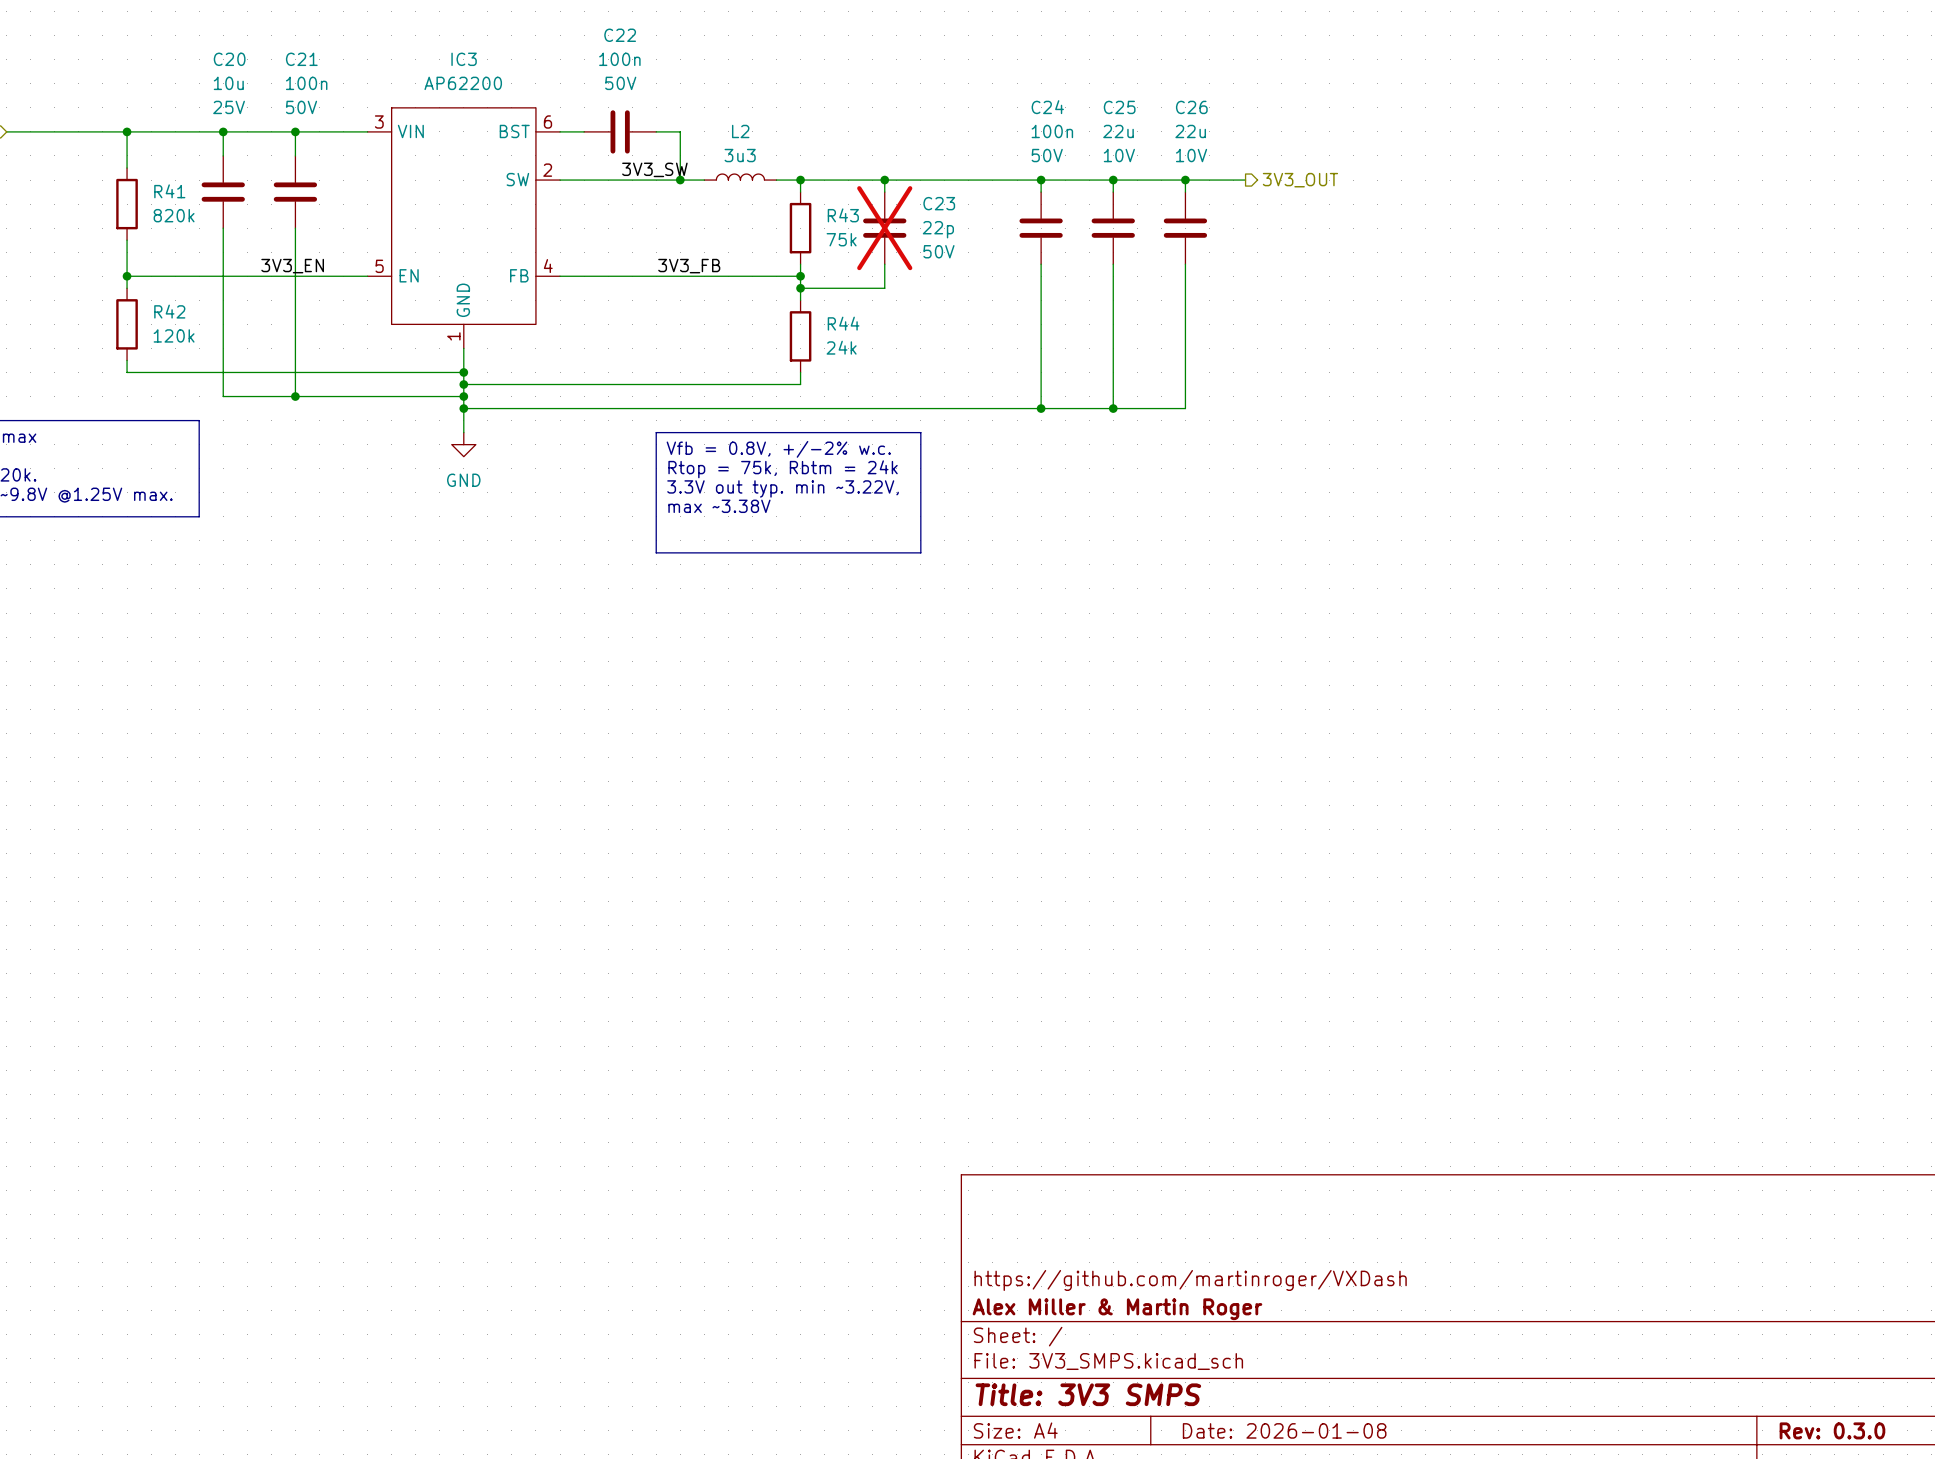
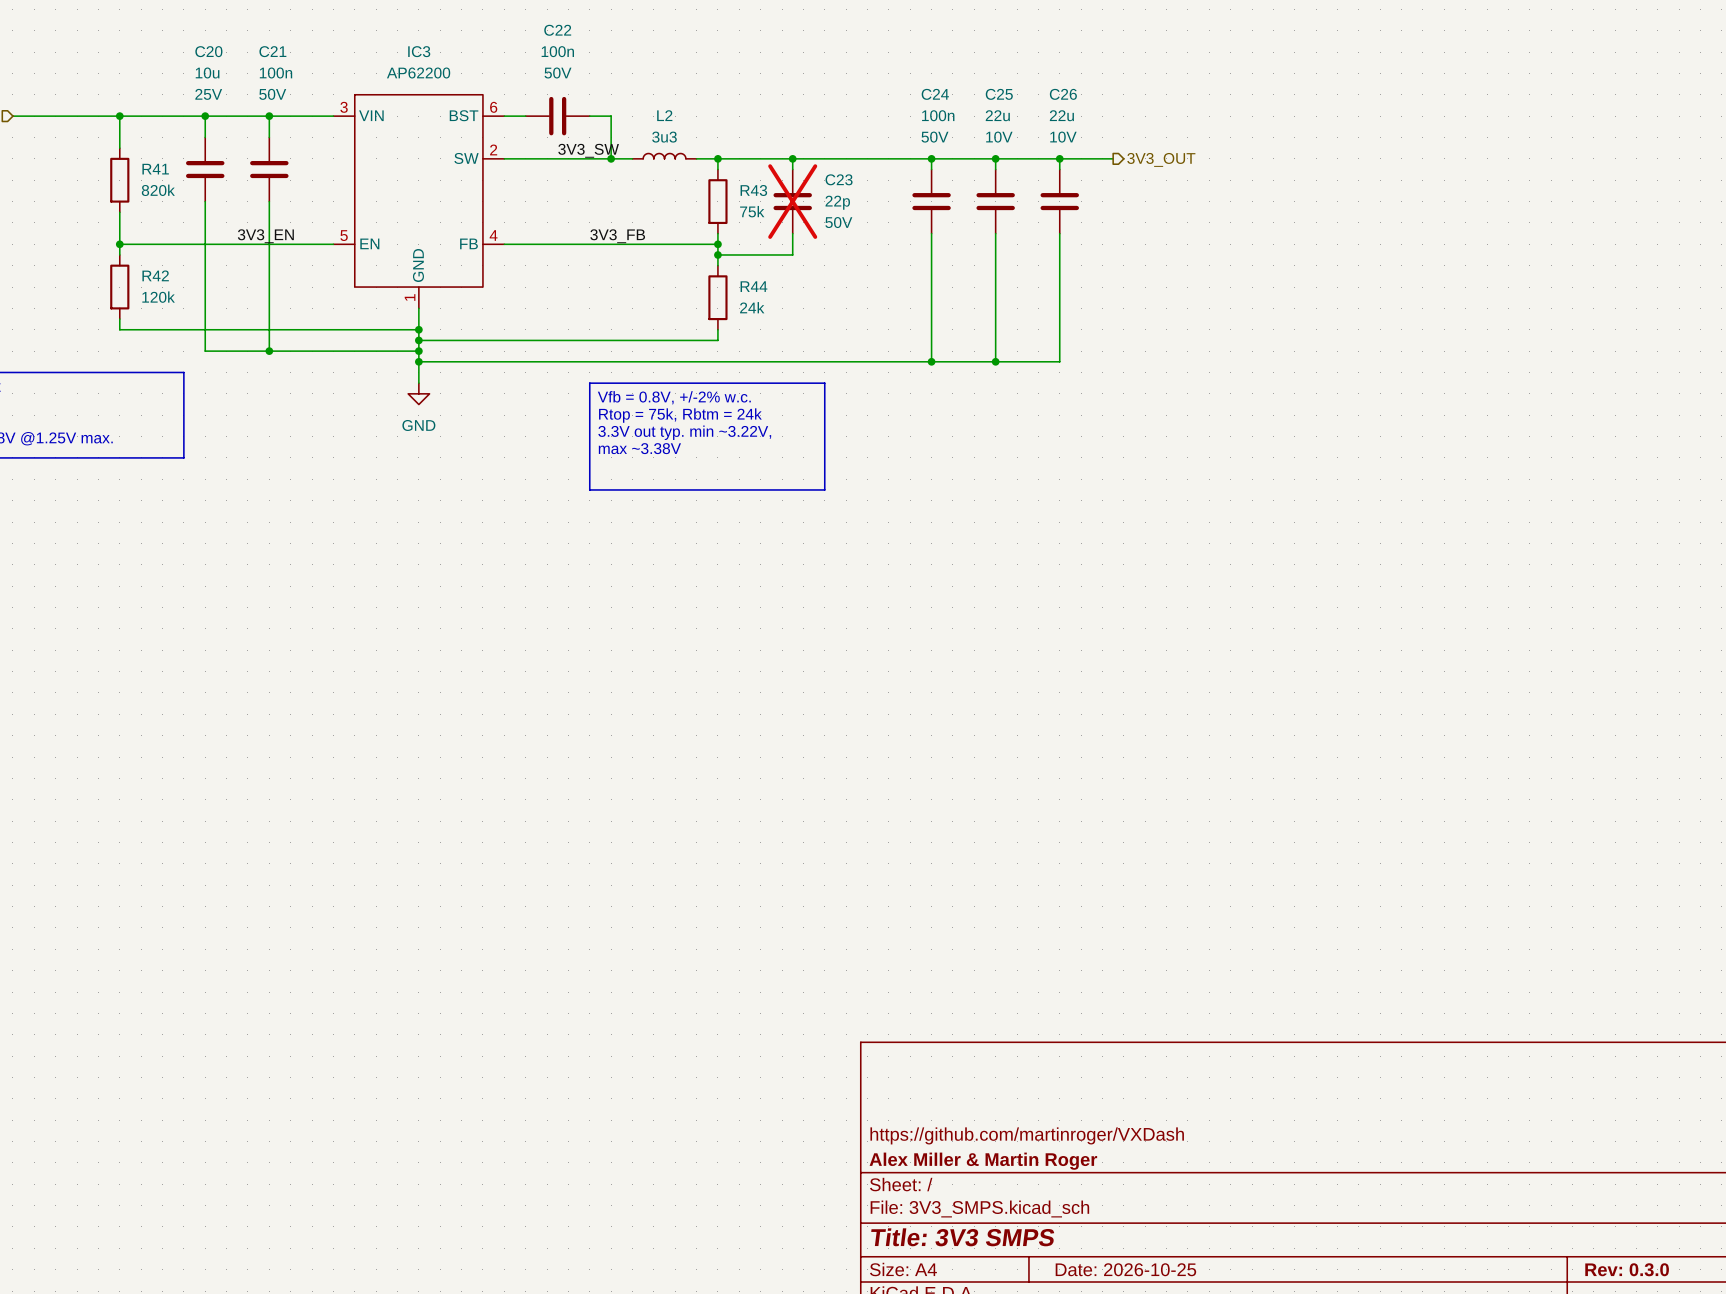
title block: Date: 2026-01-08 (1284, 1430) -> Date: 2026-10-25 (1125, 1269)

